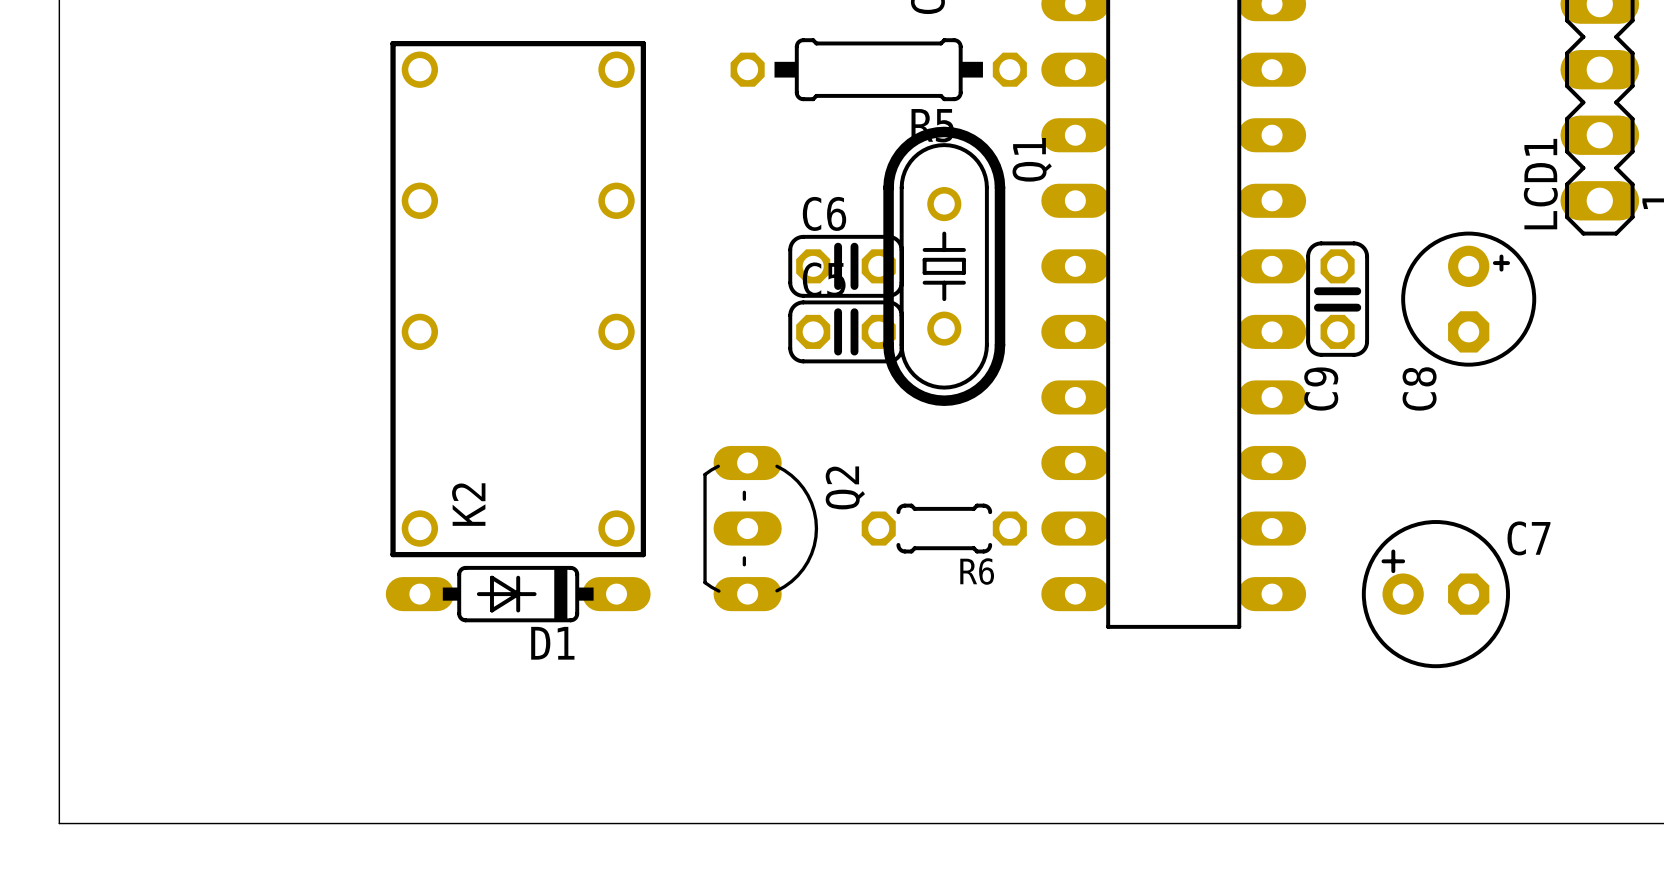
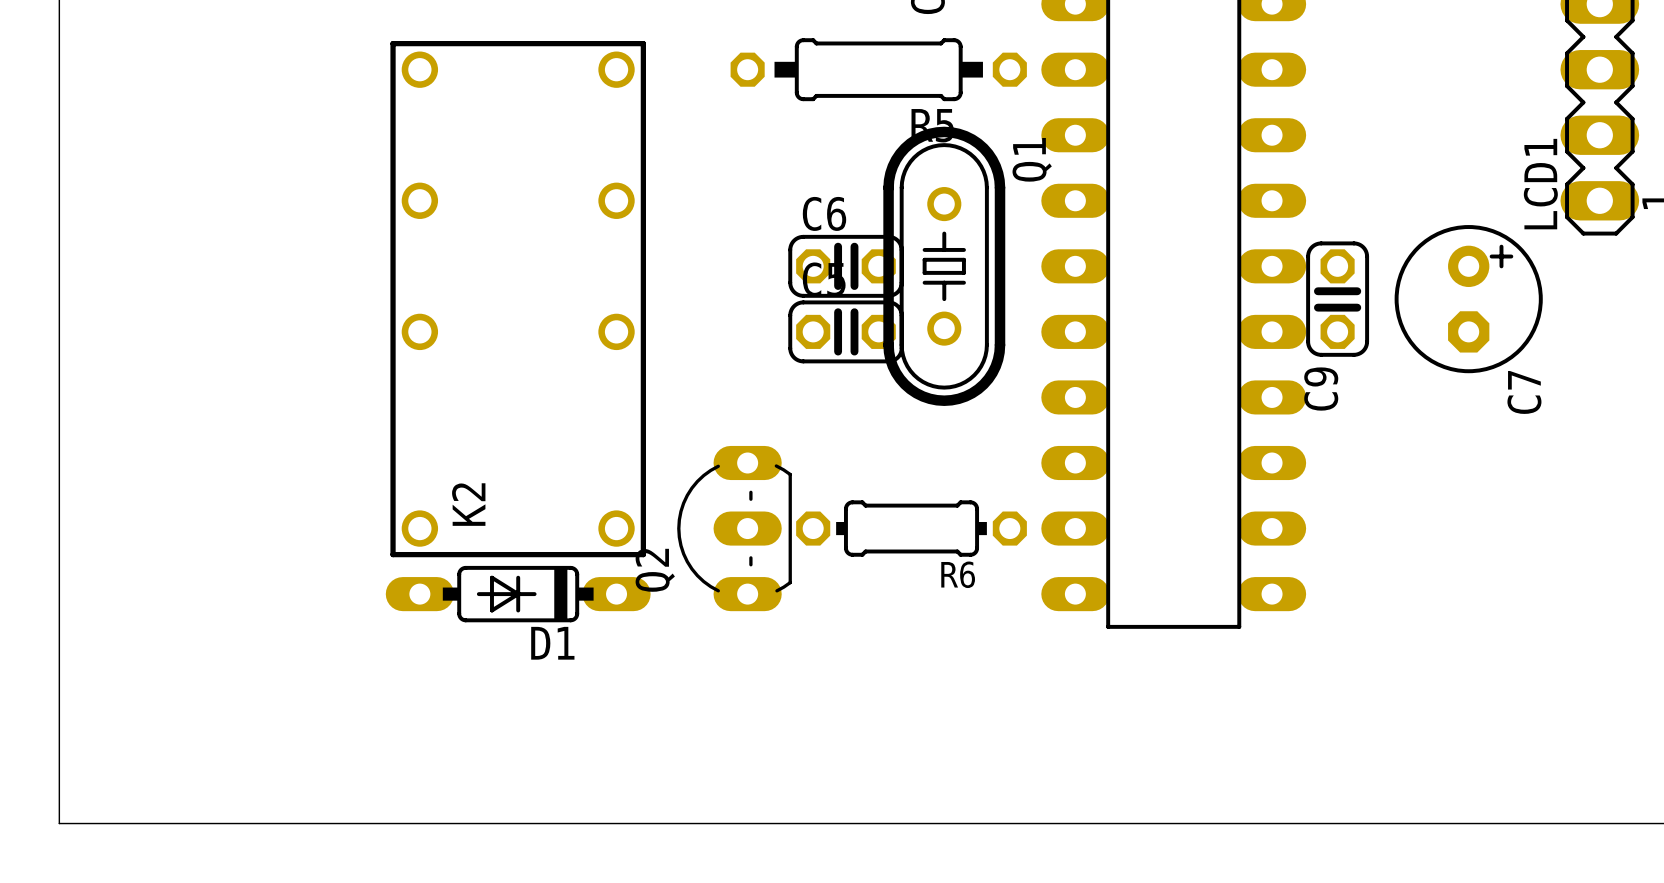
C8: (1468, 299) -> none
R6 footprint: [861, 503, 1027, 554] -> [796, 500, 1027, 557]
Q2 rotation: 0° (760, 528) -> 180° (734, 528)
C7 rotation: 0° (1435, 594) -> 90° clockwise (1468, 299)
C7 position: (1435, 594) -> (1468, 299)

